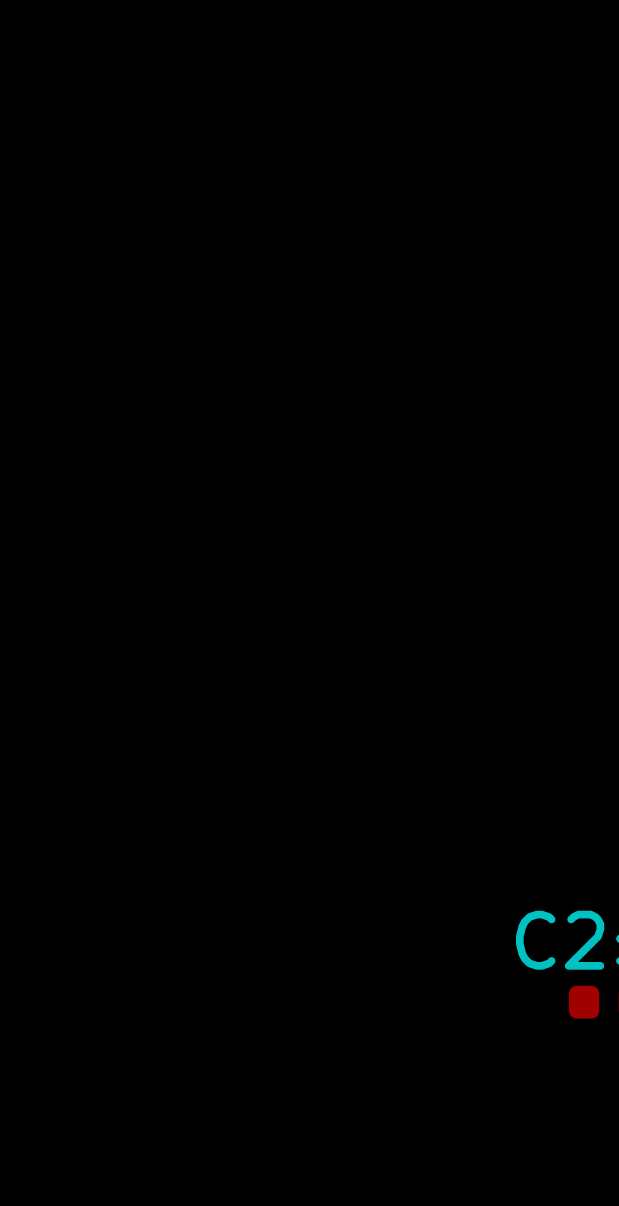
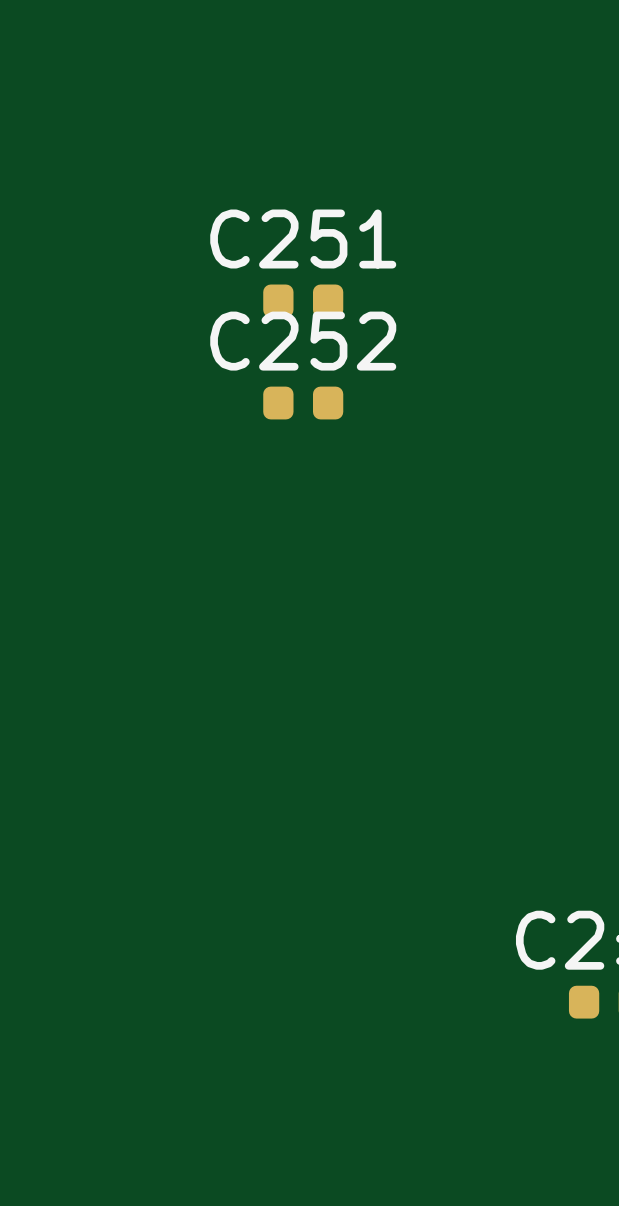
C251: none -> (303, 300)
C252: none -> (303, 403)

